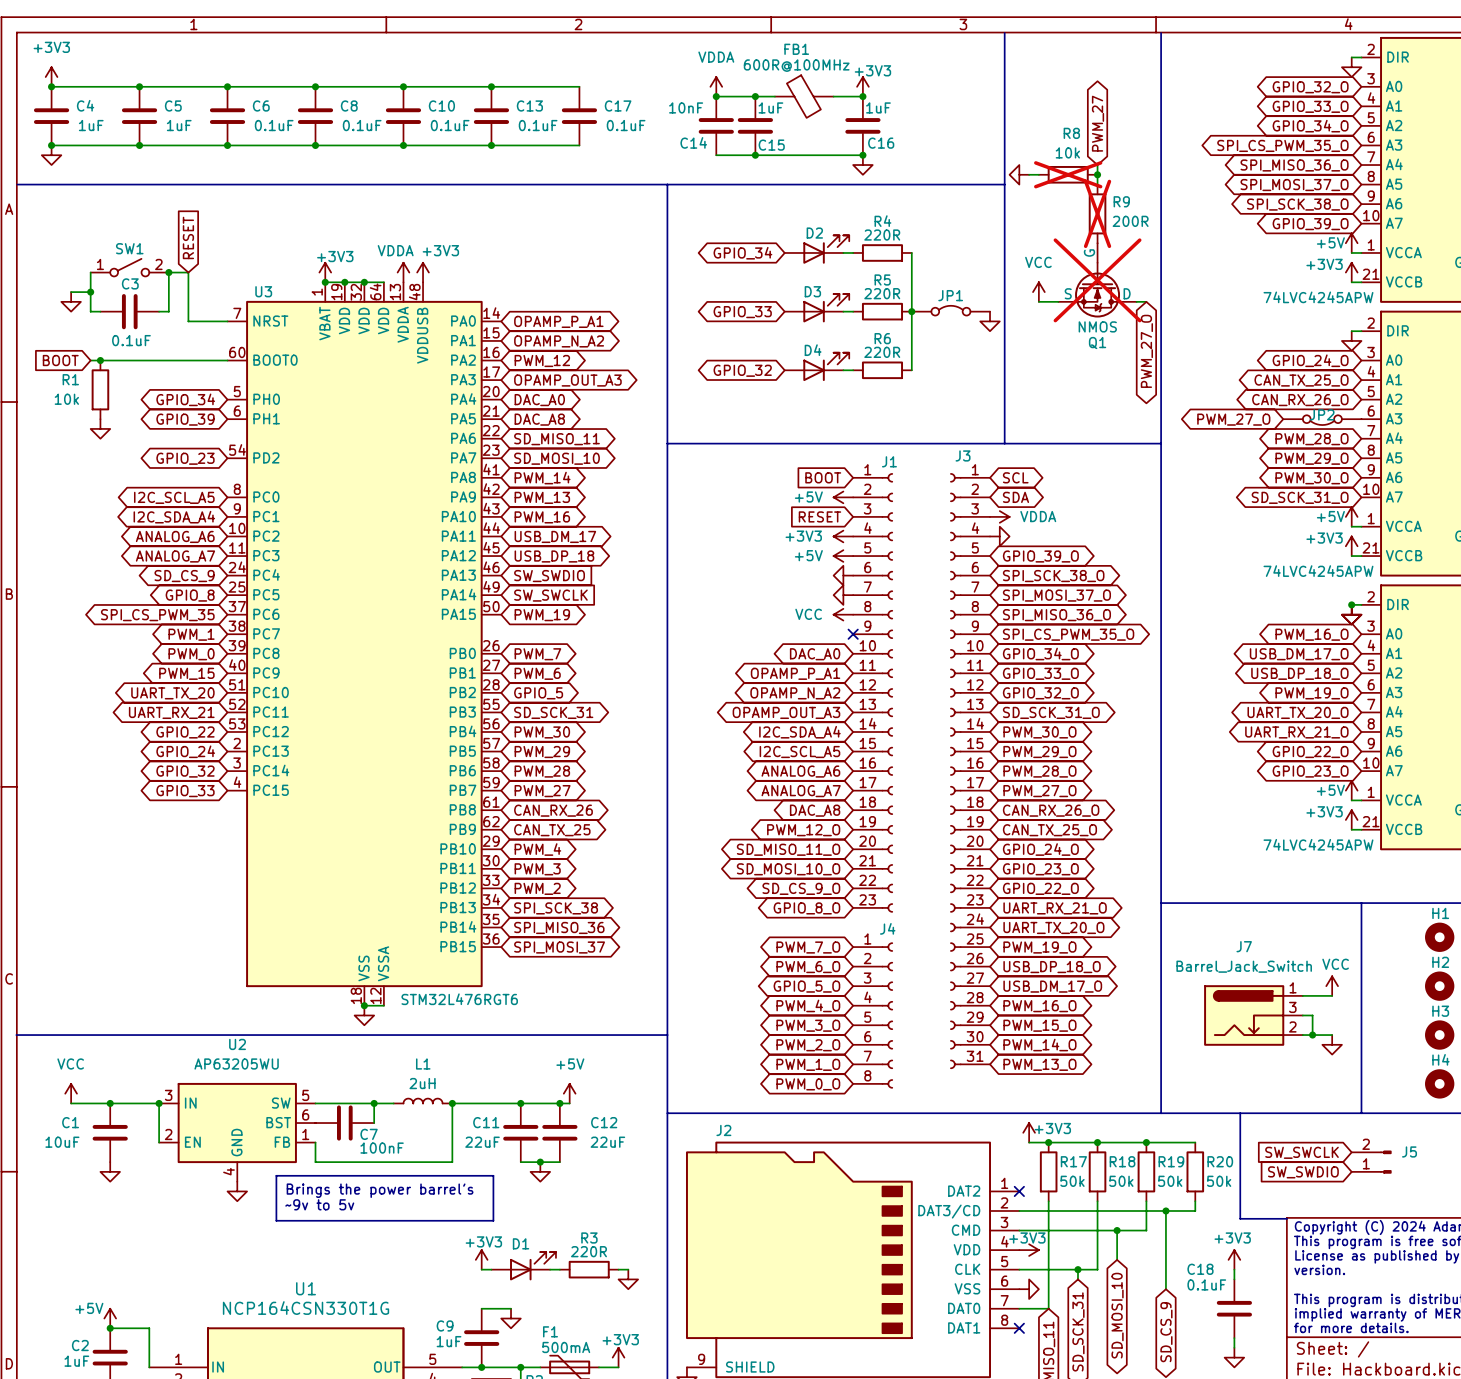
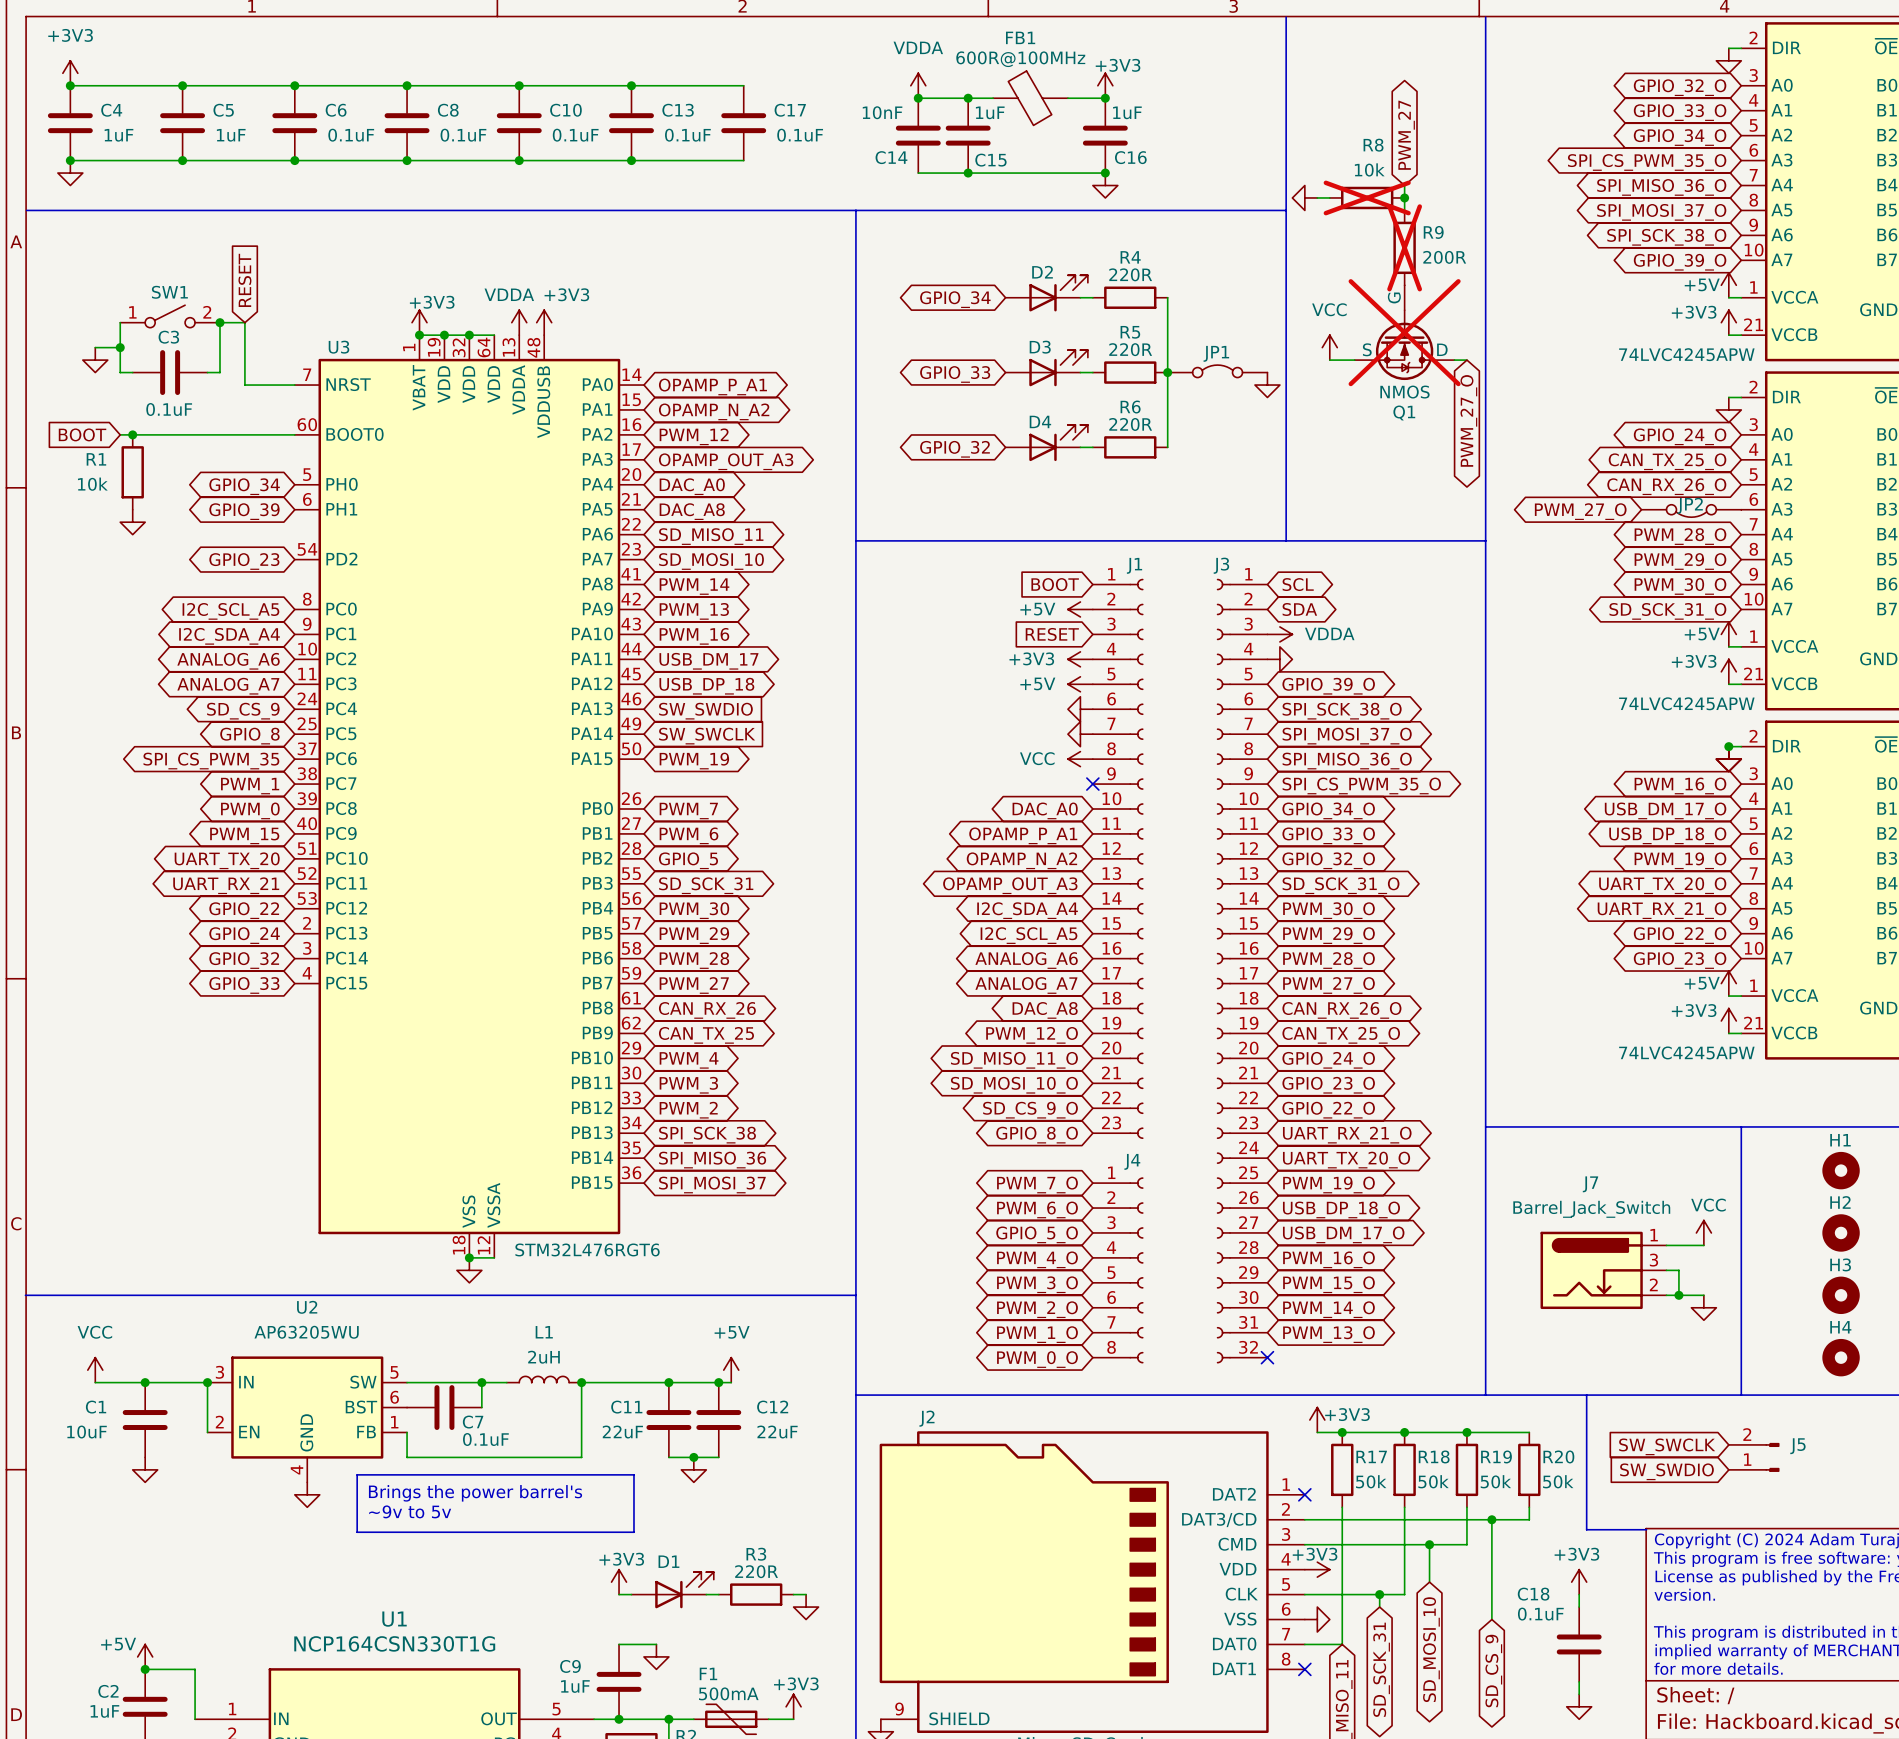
J3 symbol: [950, 473, 991, 1069] -> [1216, 578, 1268, 1364]
no-connect mark: none -> (1267, 1357)
C7 value: 100nF (382, 1148) -> 0.1uF (485, 1439)

